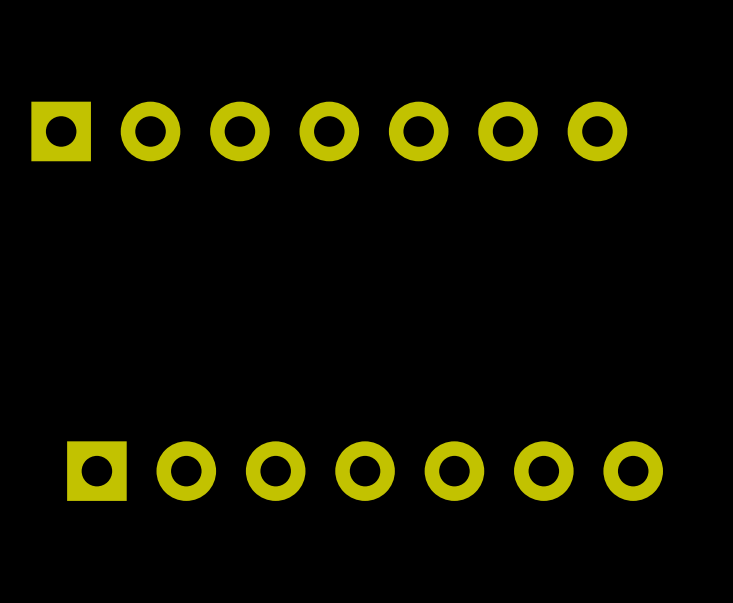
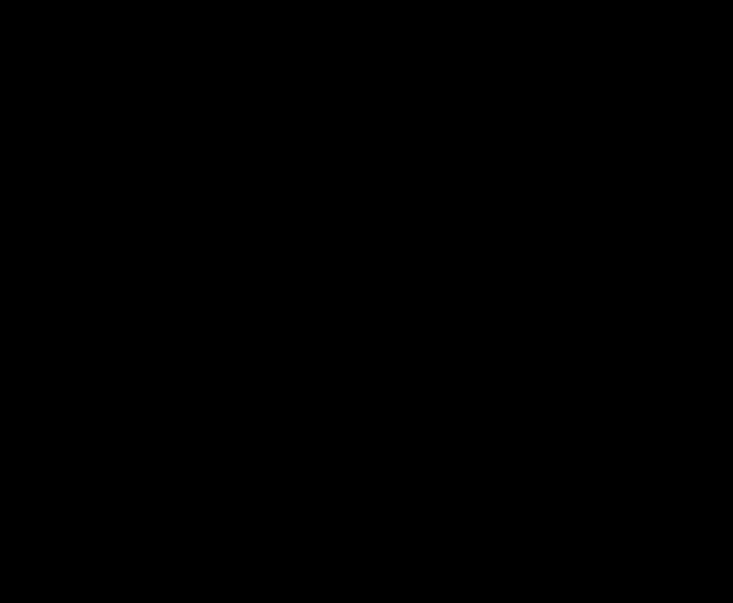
part: (329, 131) -> none
part: (365, 471) -> none

